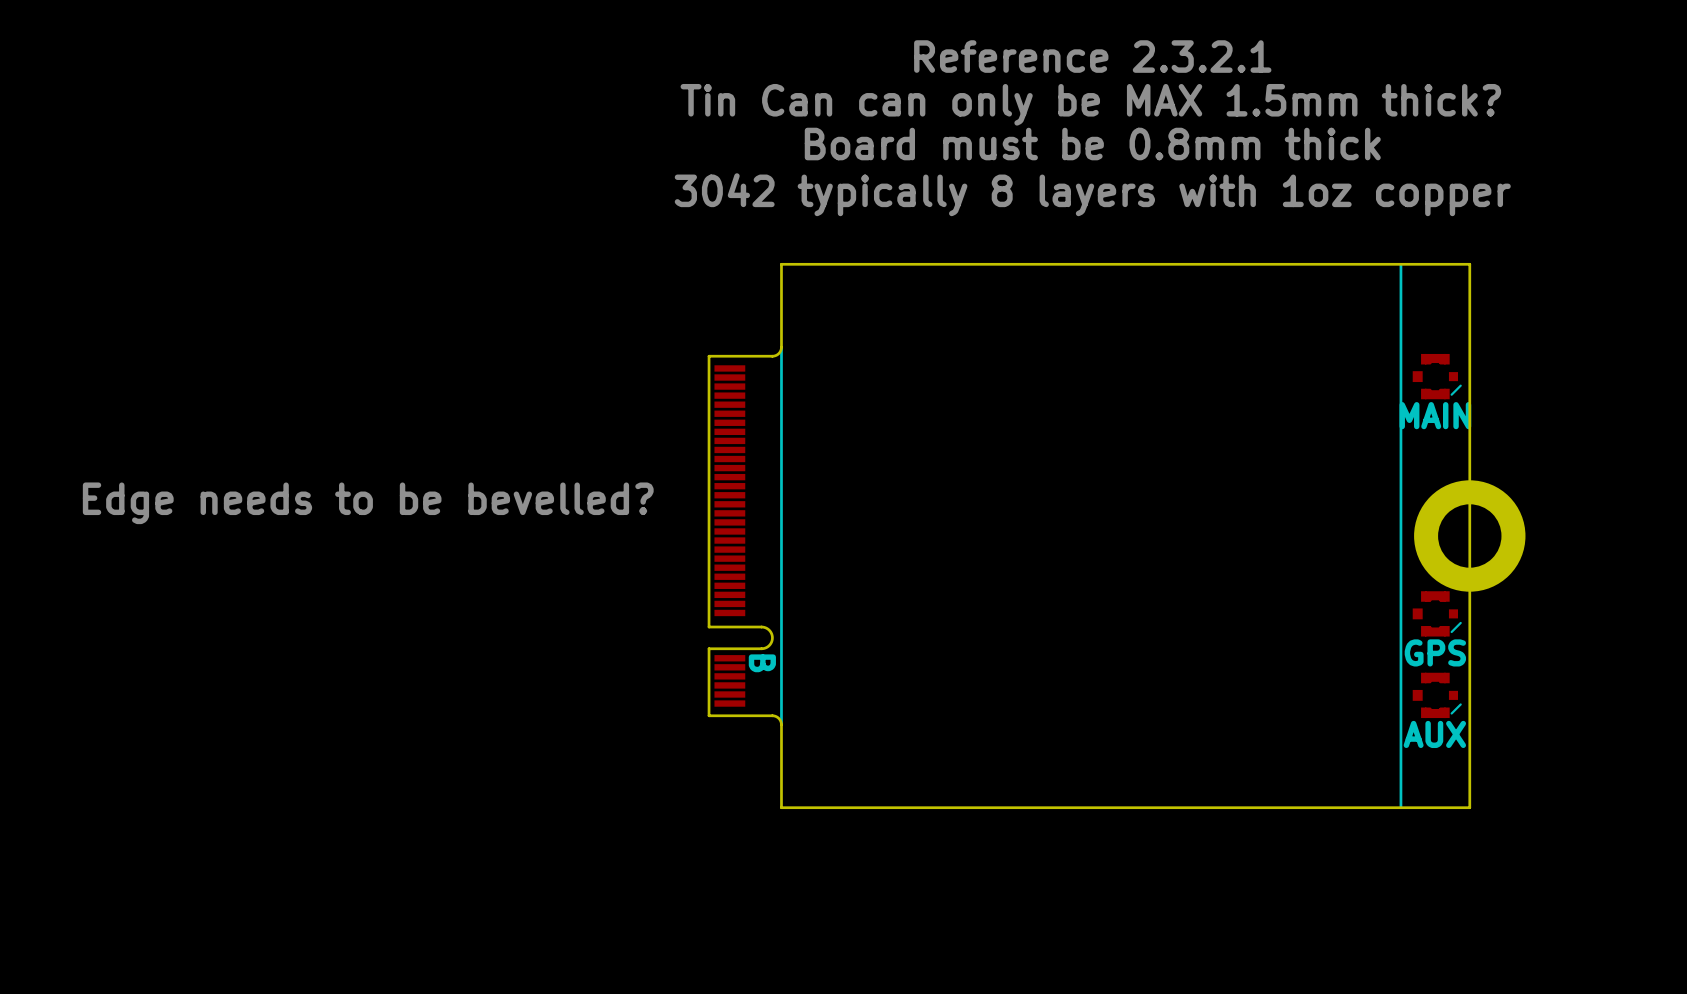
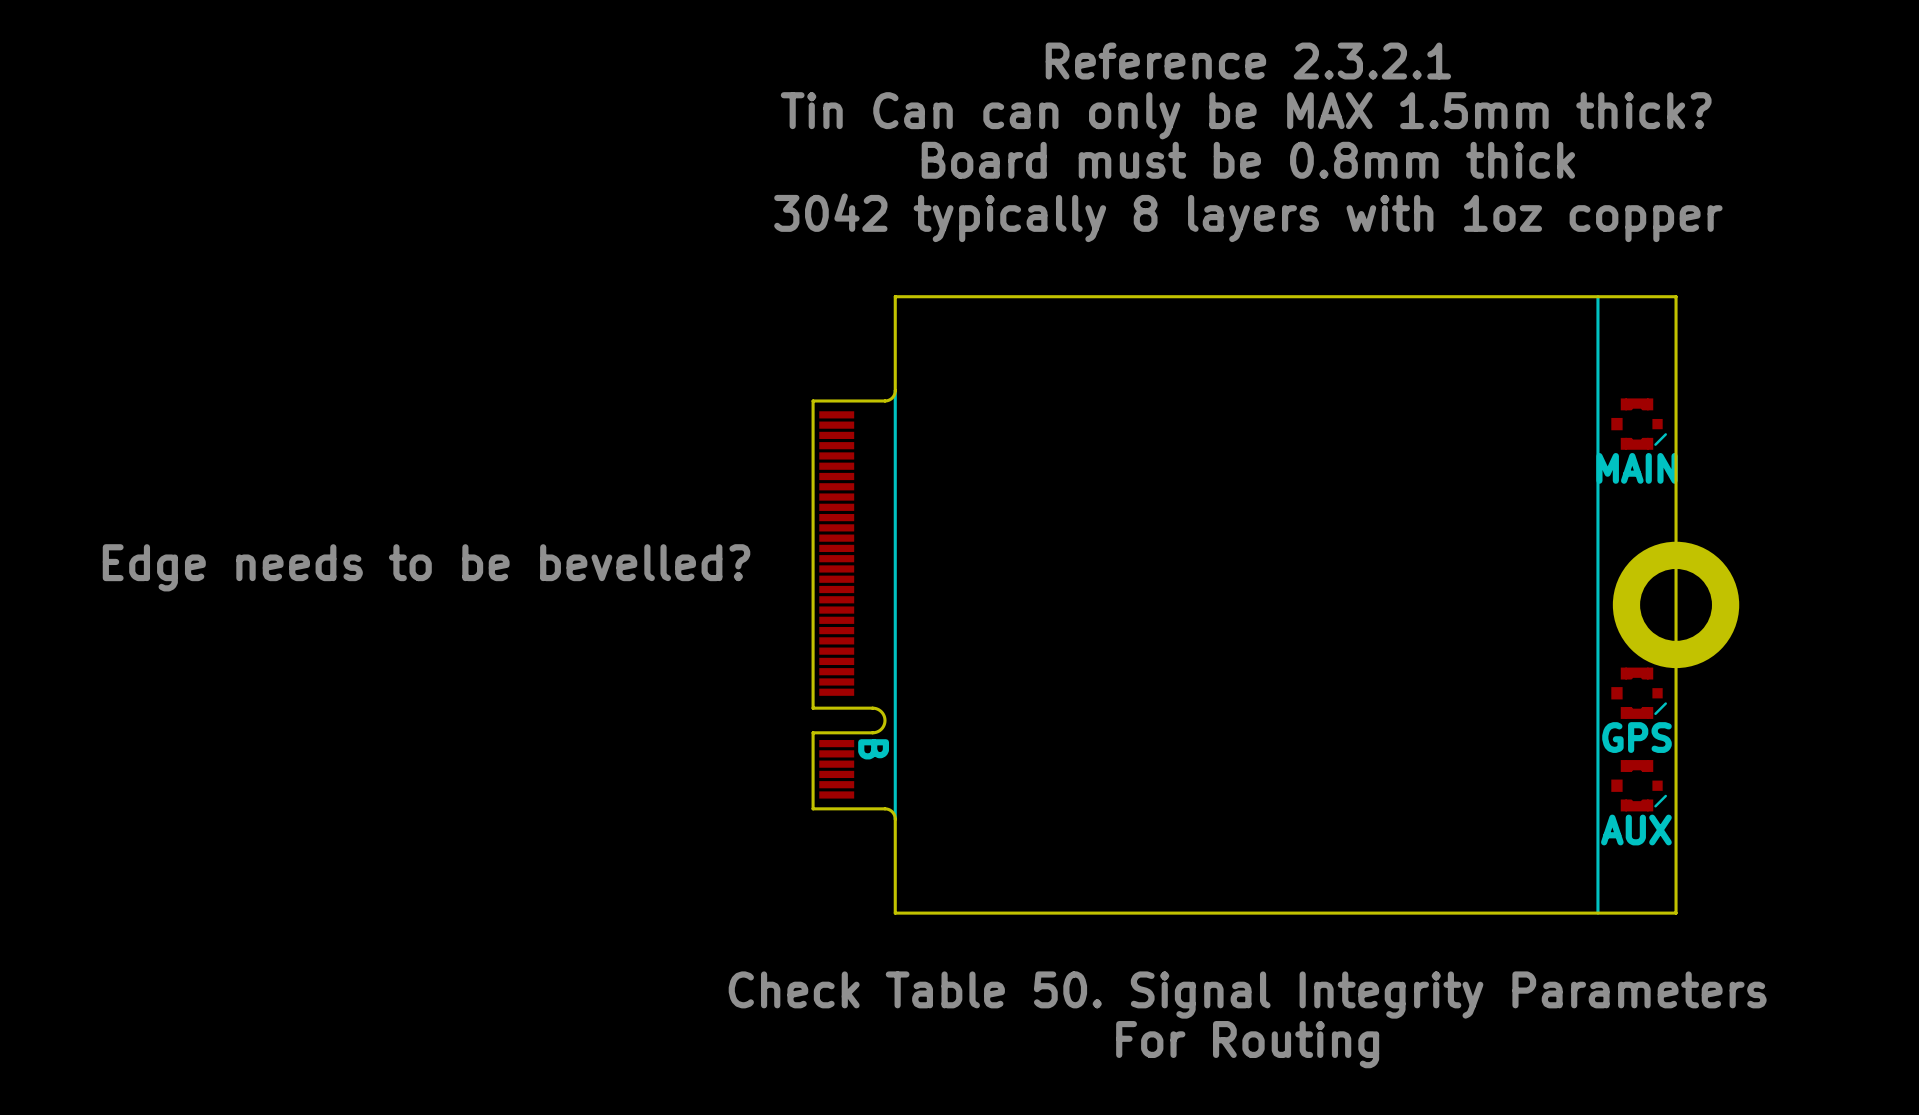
text: none -> Check Table 50. Signal Integrity Parameters (1247, 995)
text: none -> For Routing (1247, 1044)

